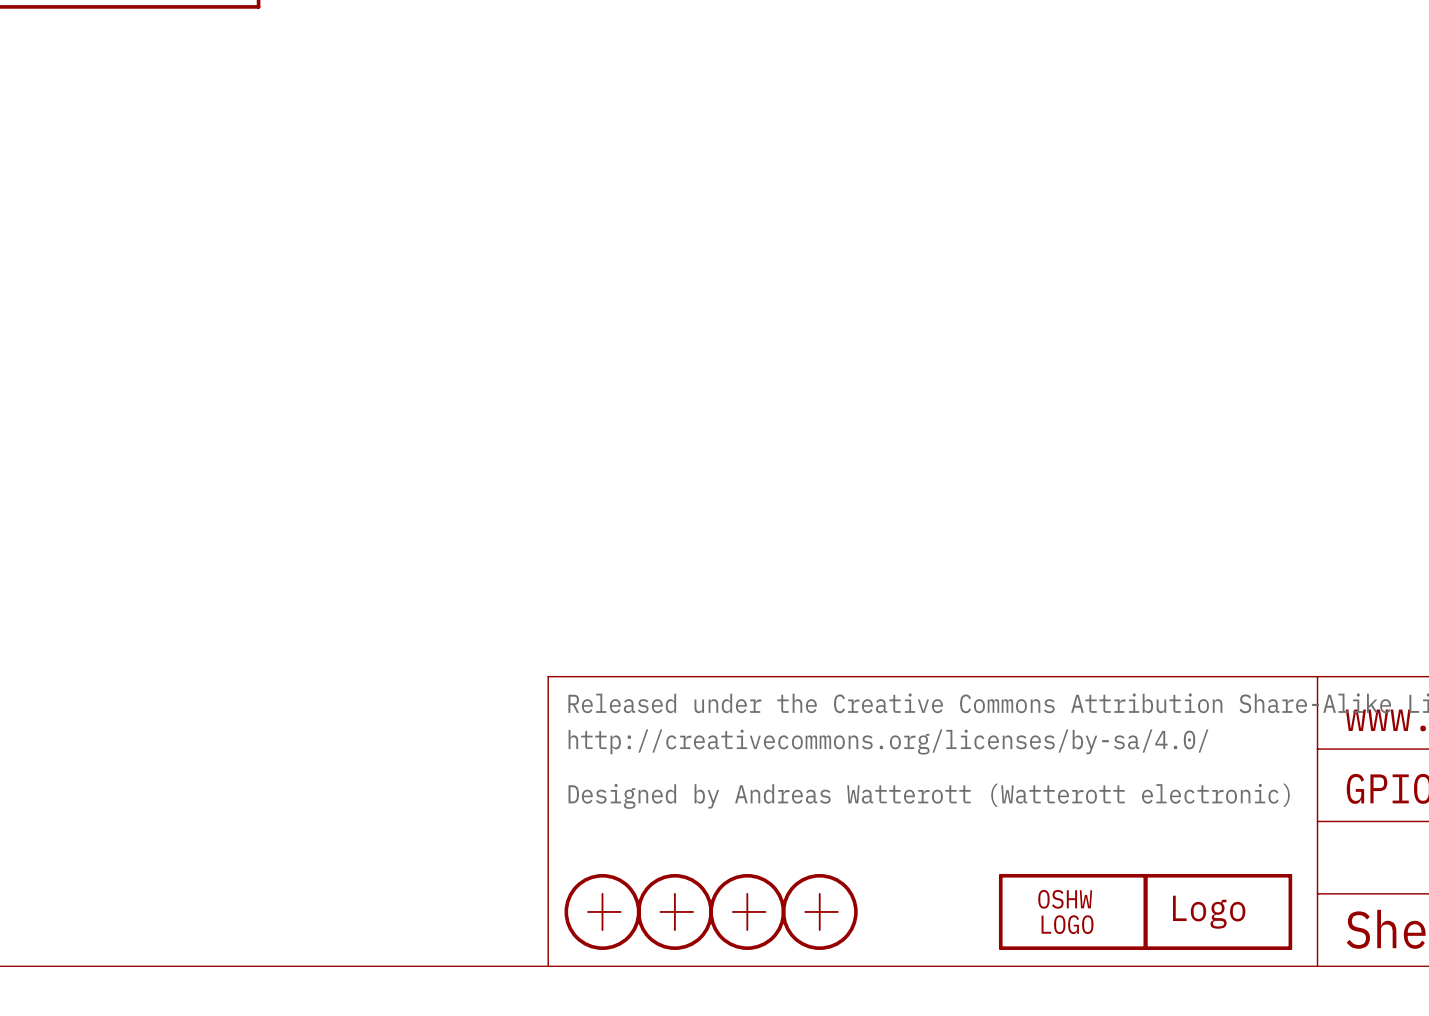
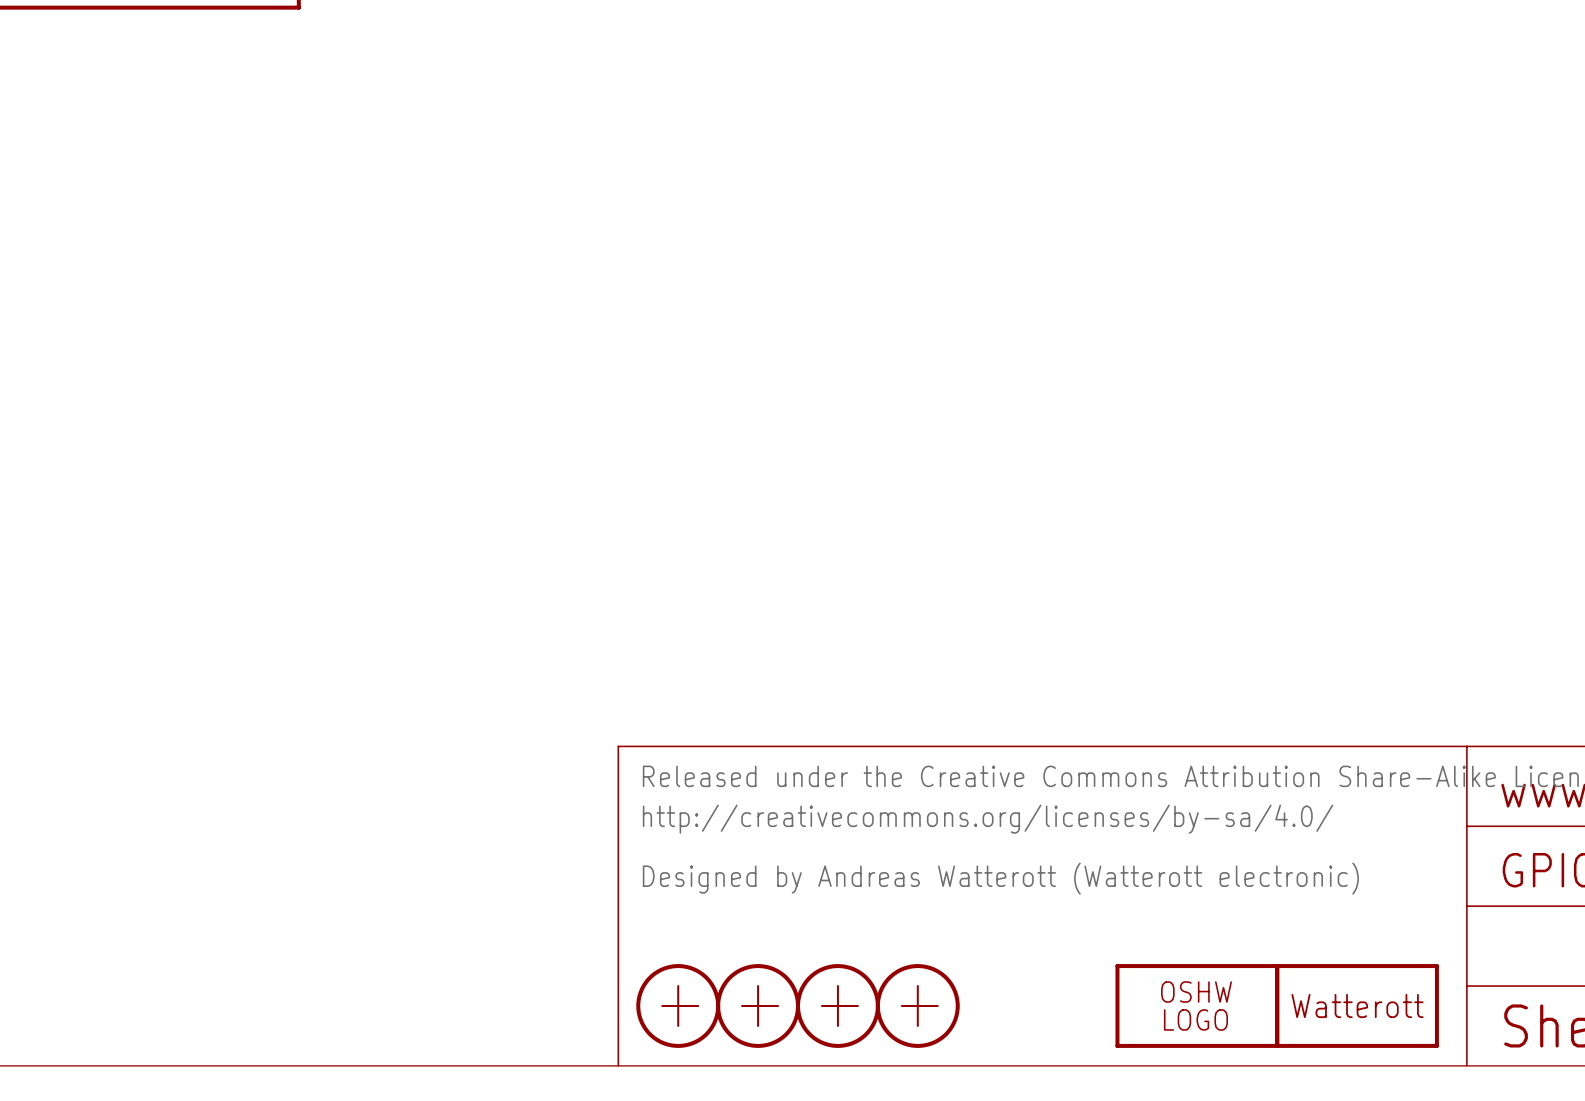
part text: Logo (1209, 912) -> none
part text: none -> Watterott (1357, 1005)

